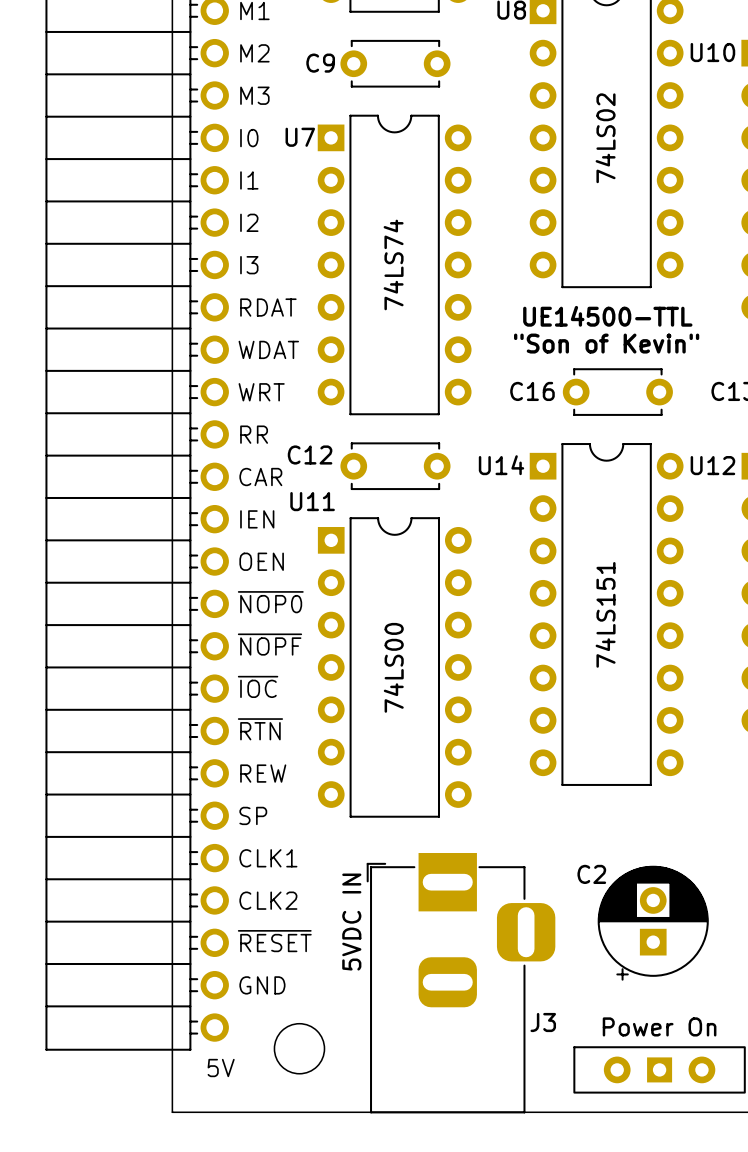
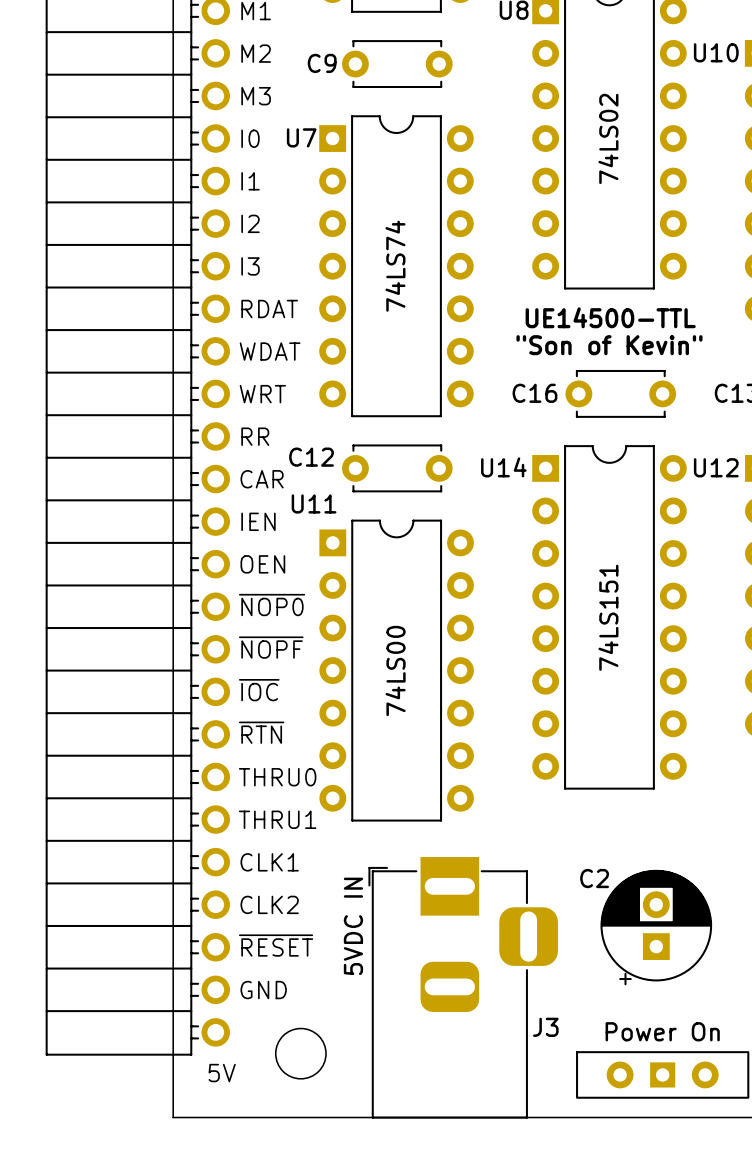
text: REW (263, 773) -> THRU0 (277, 777)
text: SP (253, 815) -> THRU1 (277, 819)

